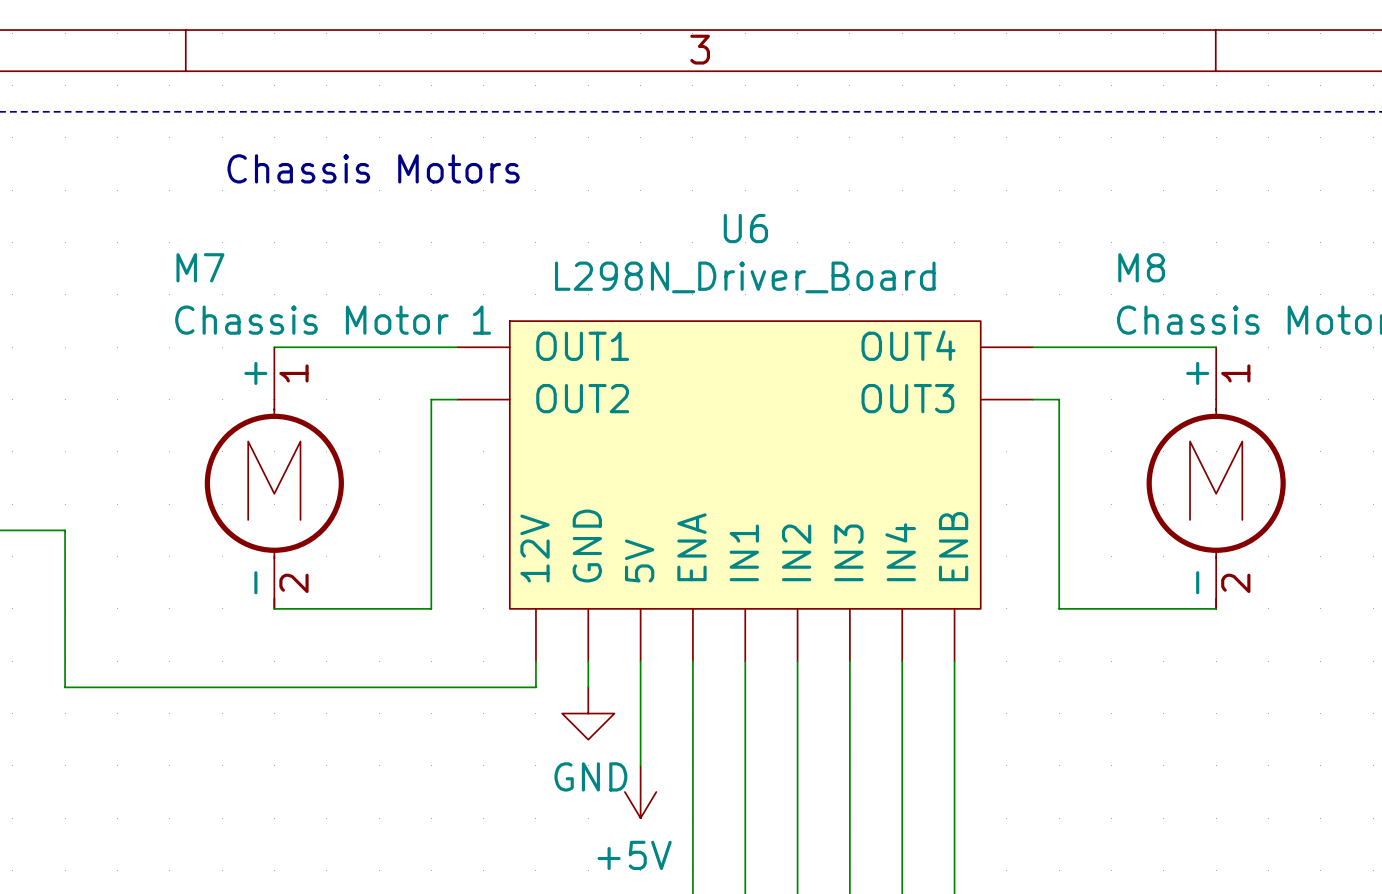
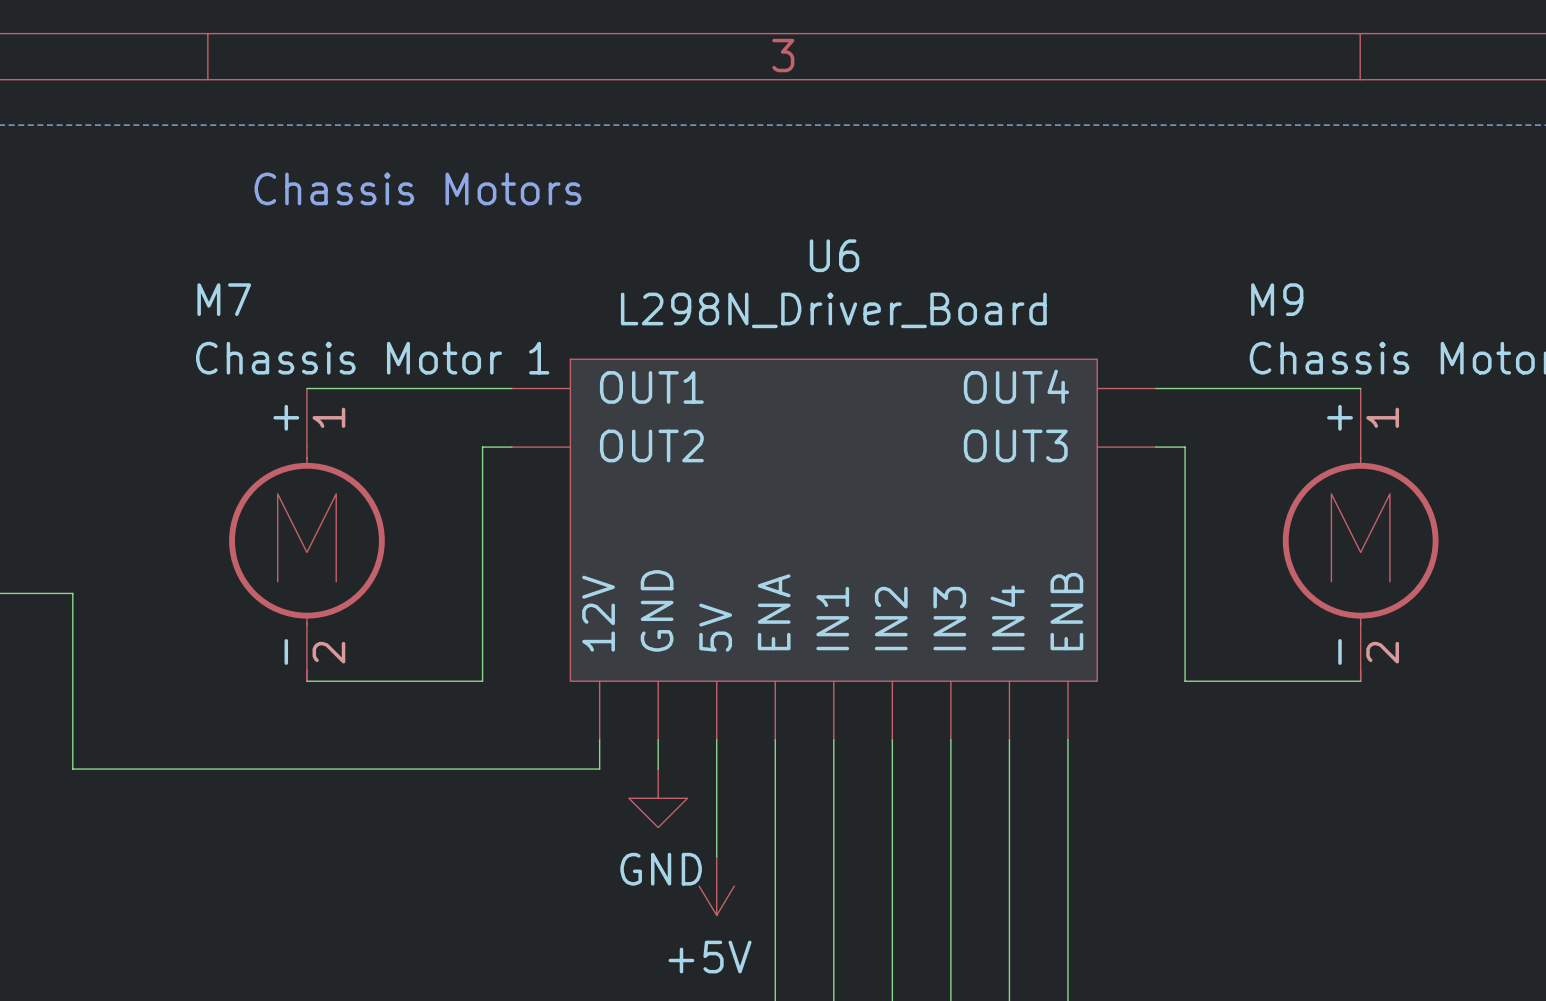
M8 name: M8 (1141, 267) -> M9 (1277, 299)

